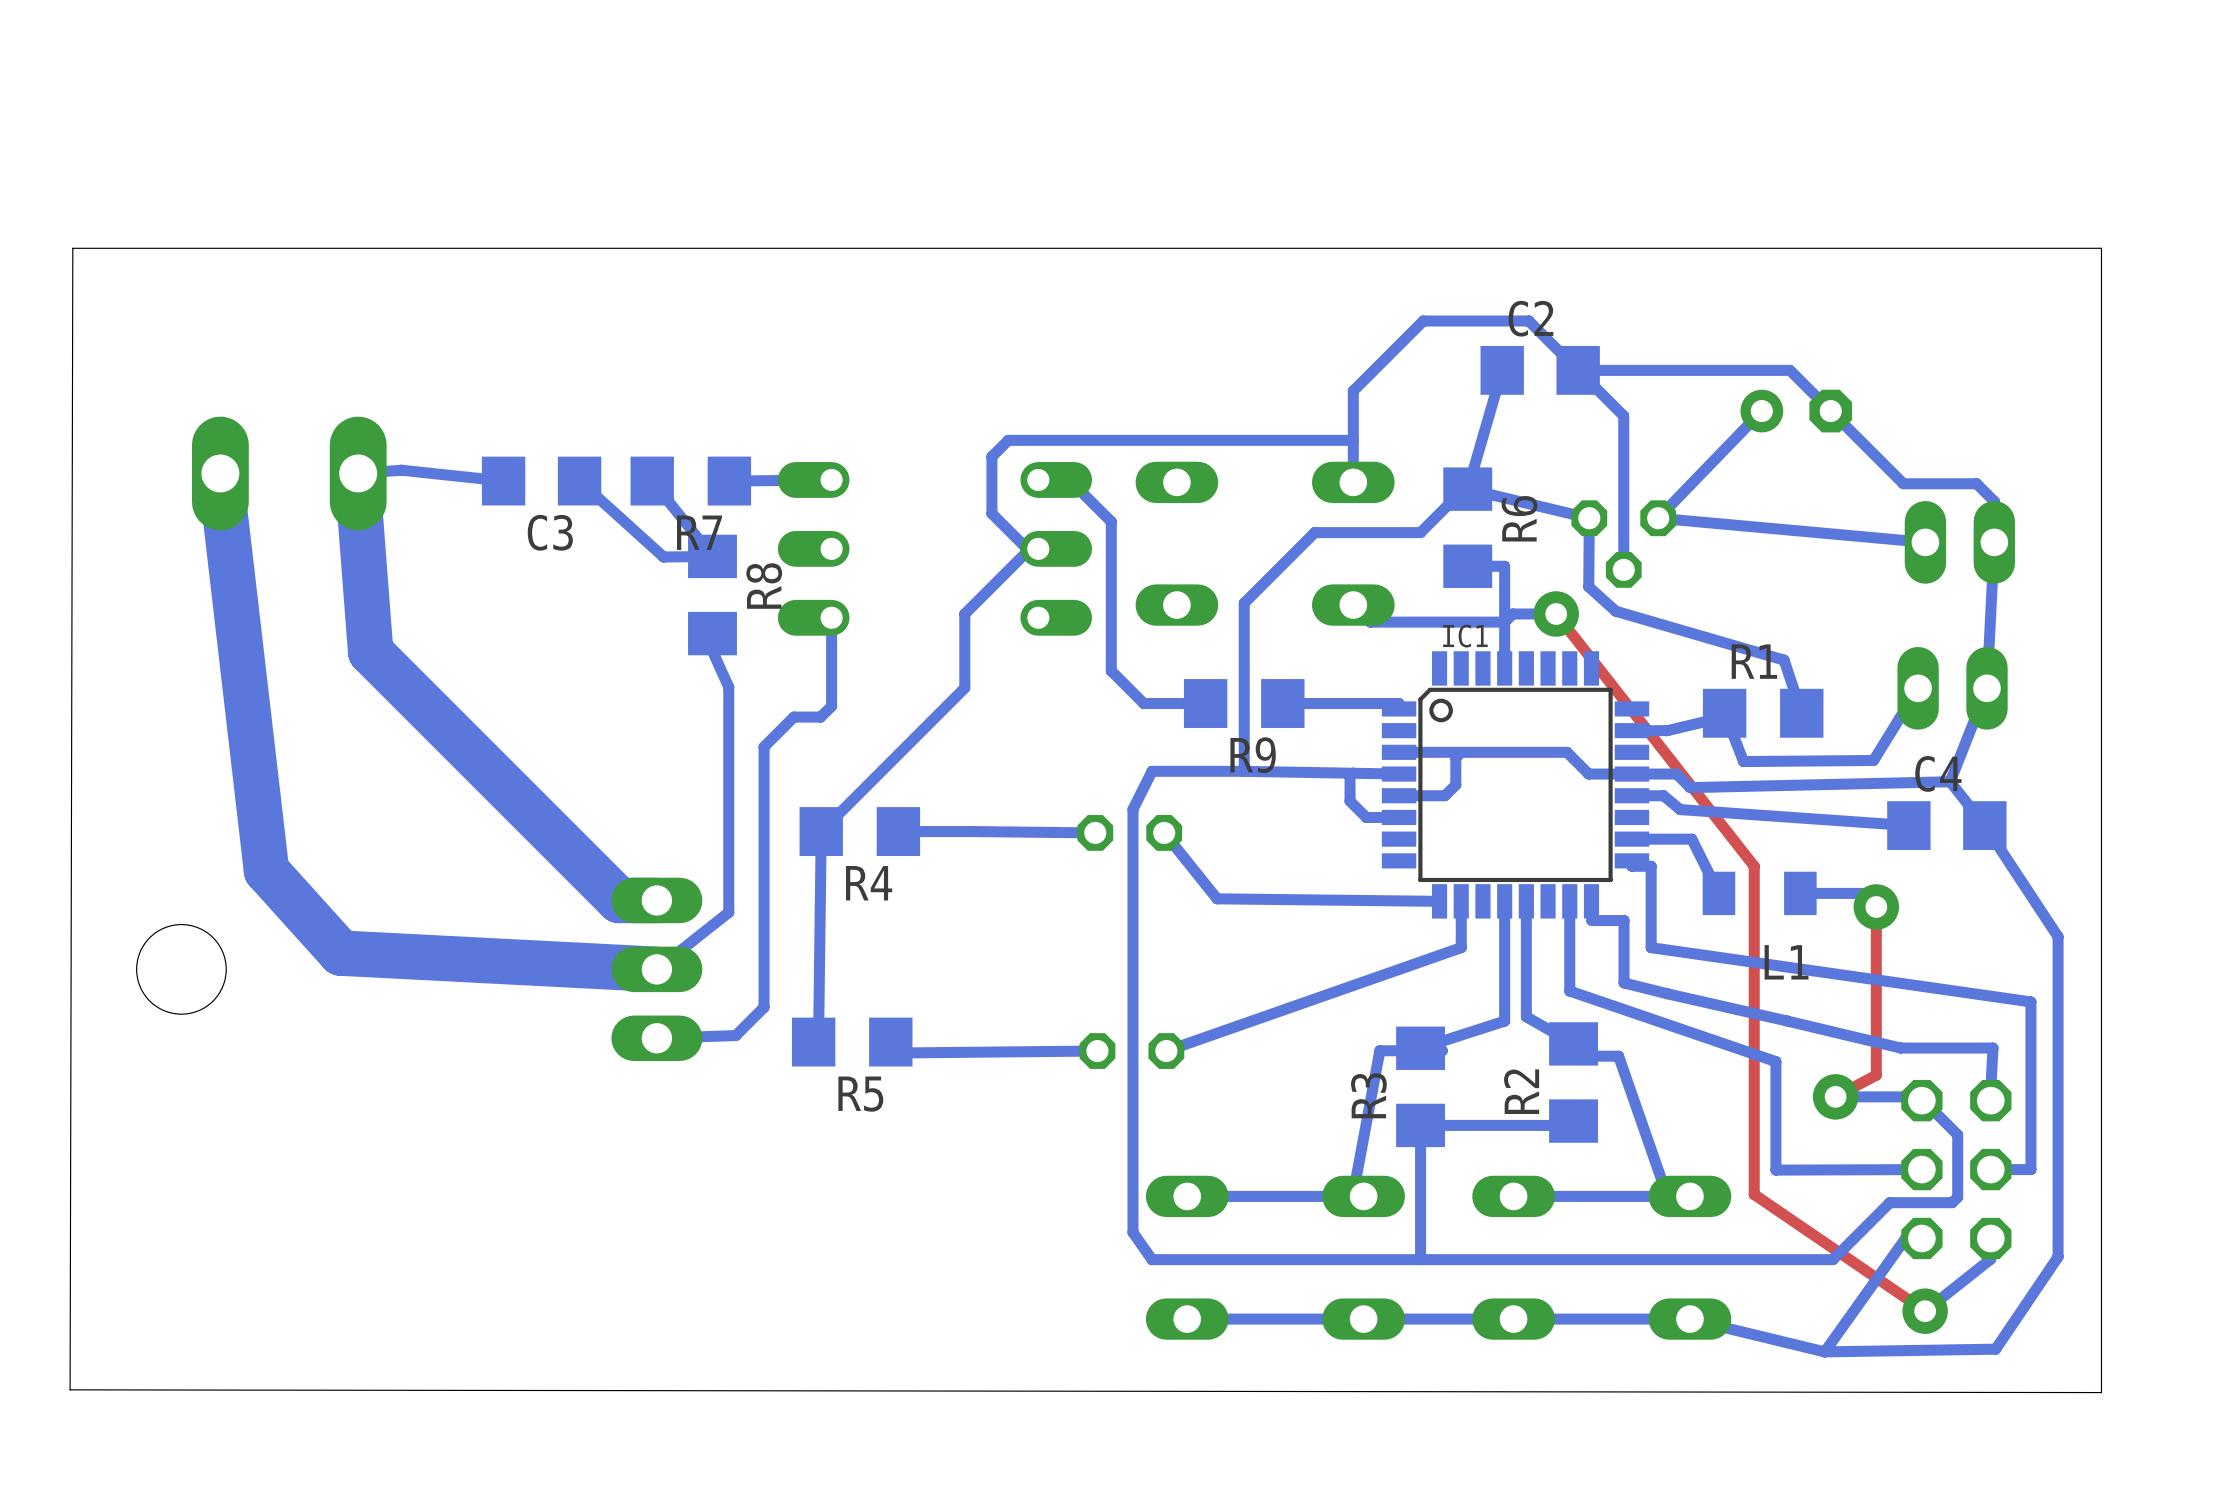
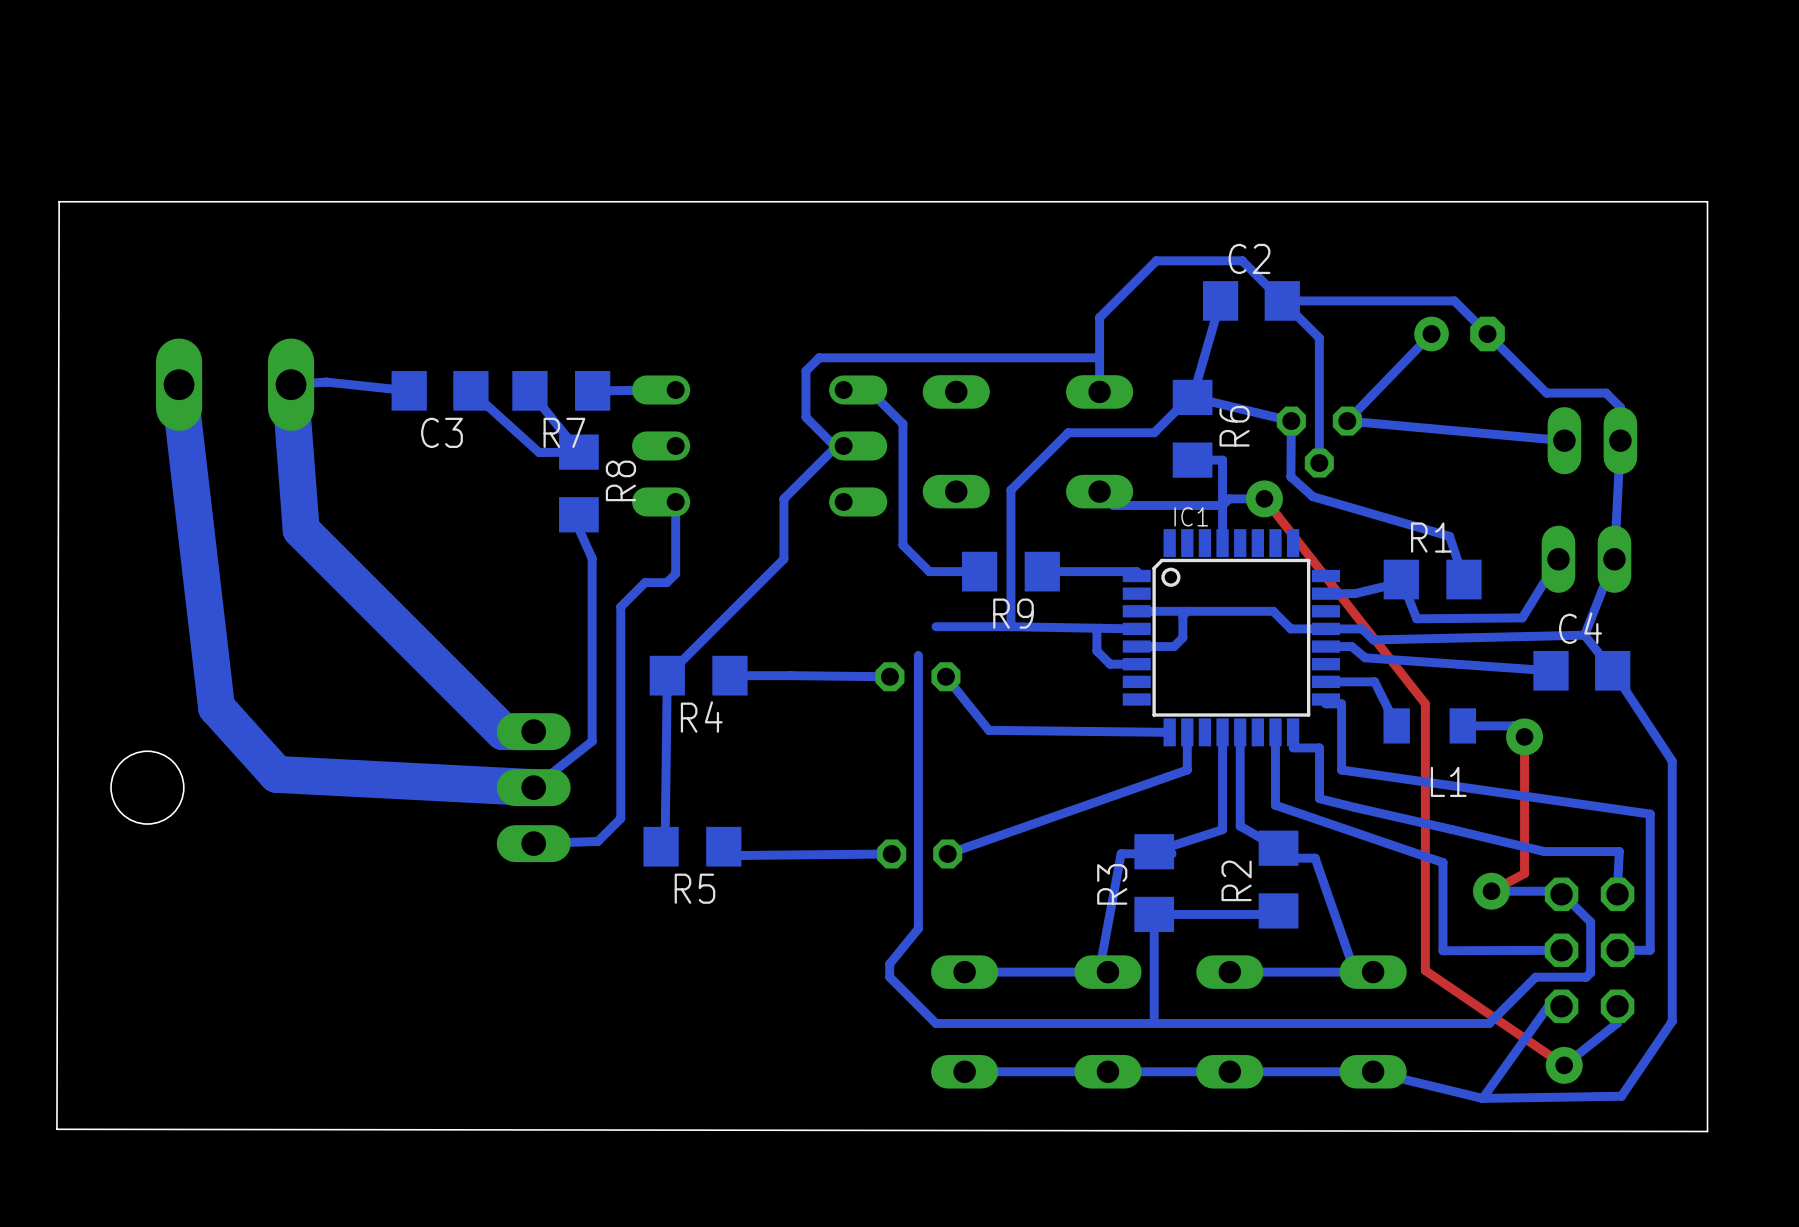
bottom track: (1151, 771) (1132, 809) (1132, 1232) (1151, 1259) -> (918, 655) (918, 928) (889, 963) (889, 977) (936, 1023)

